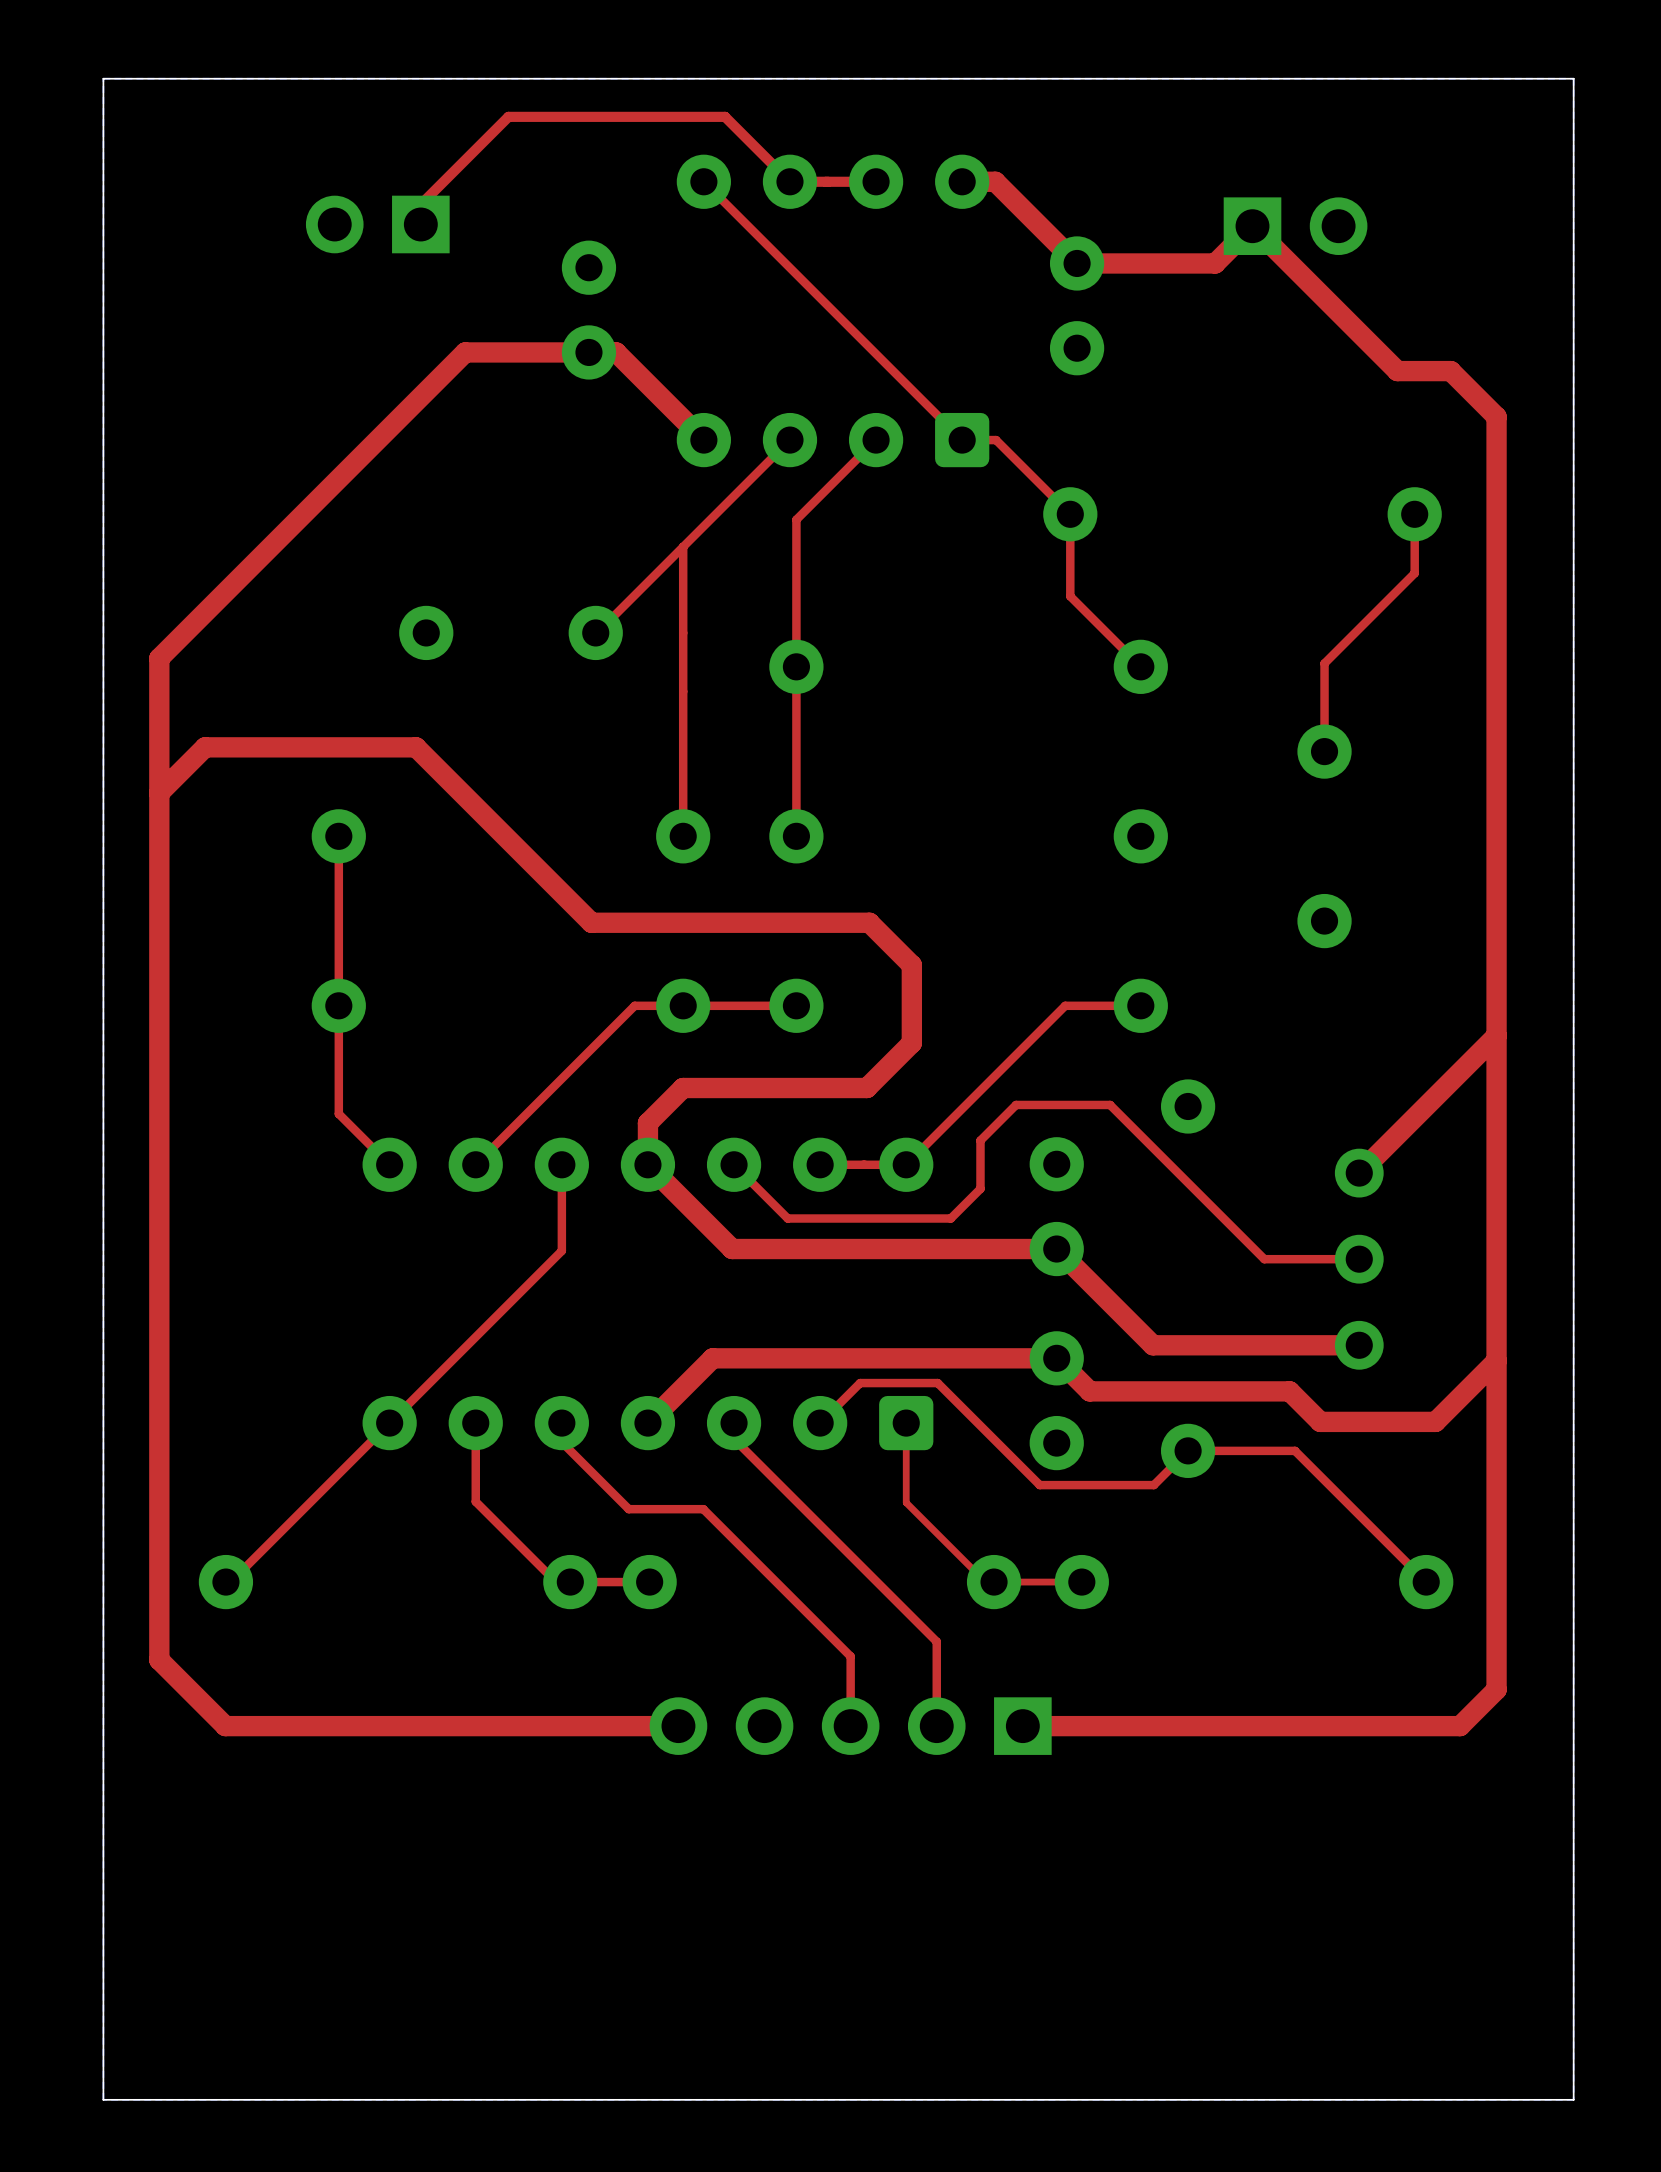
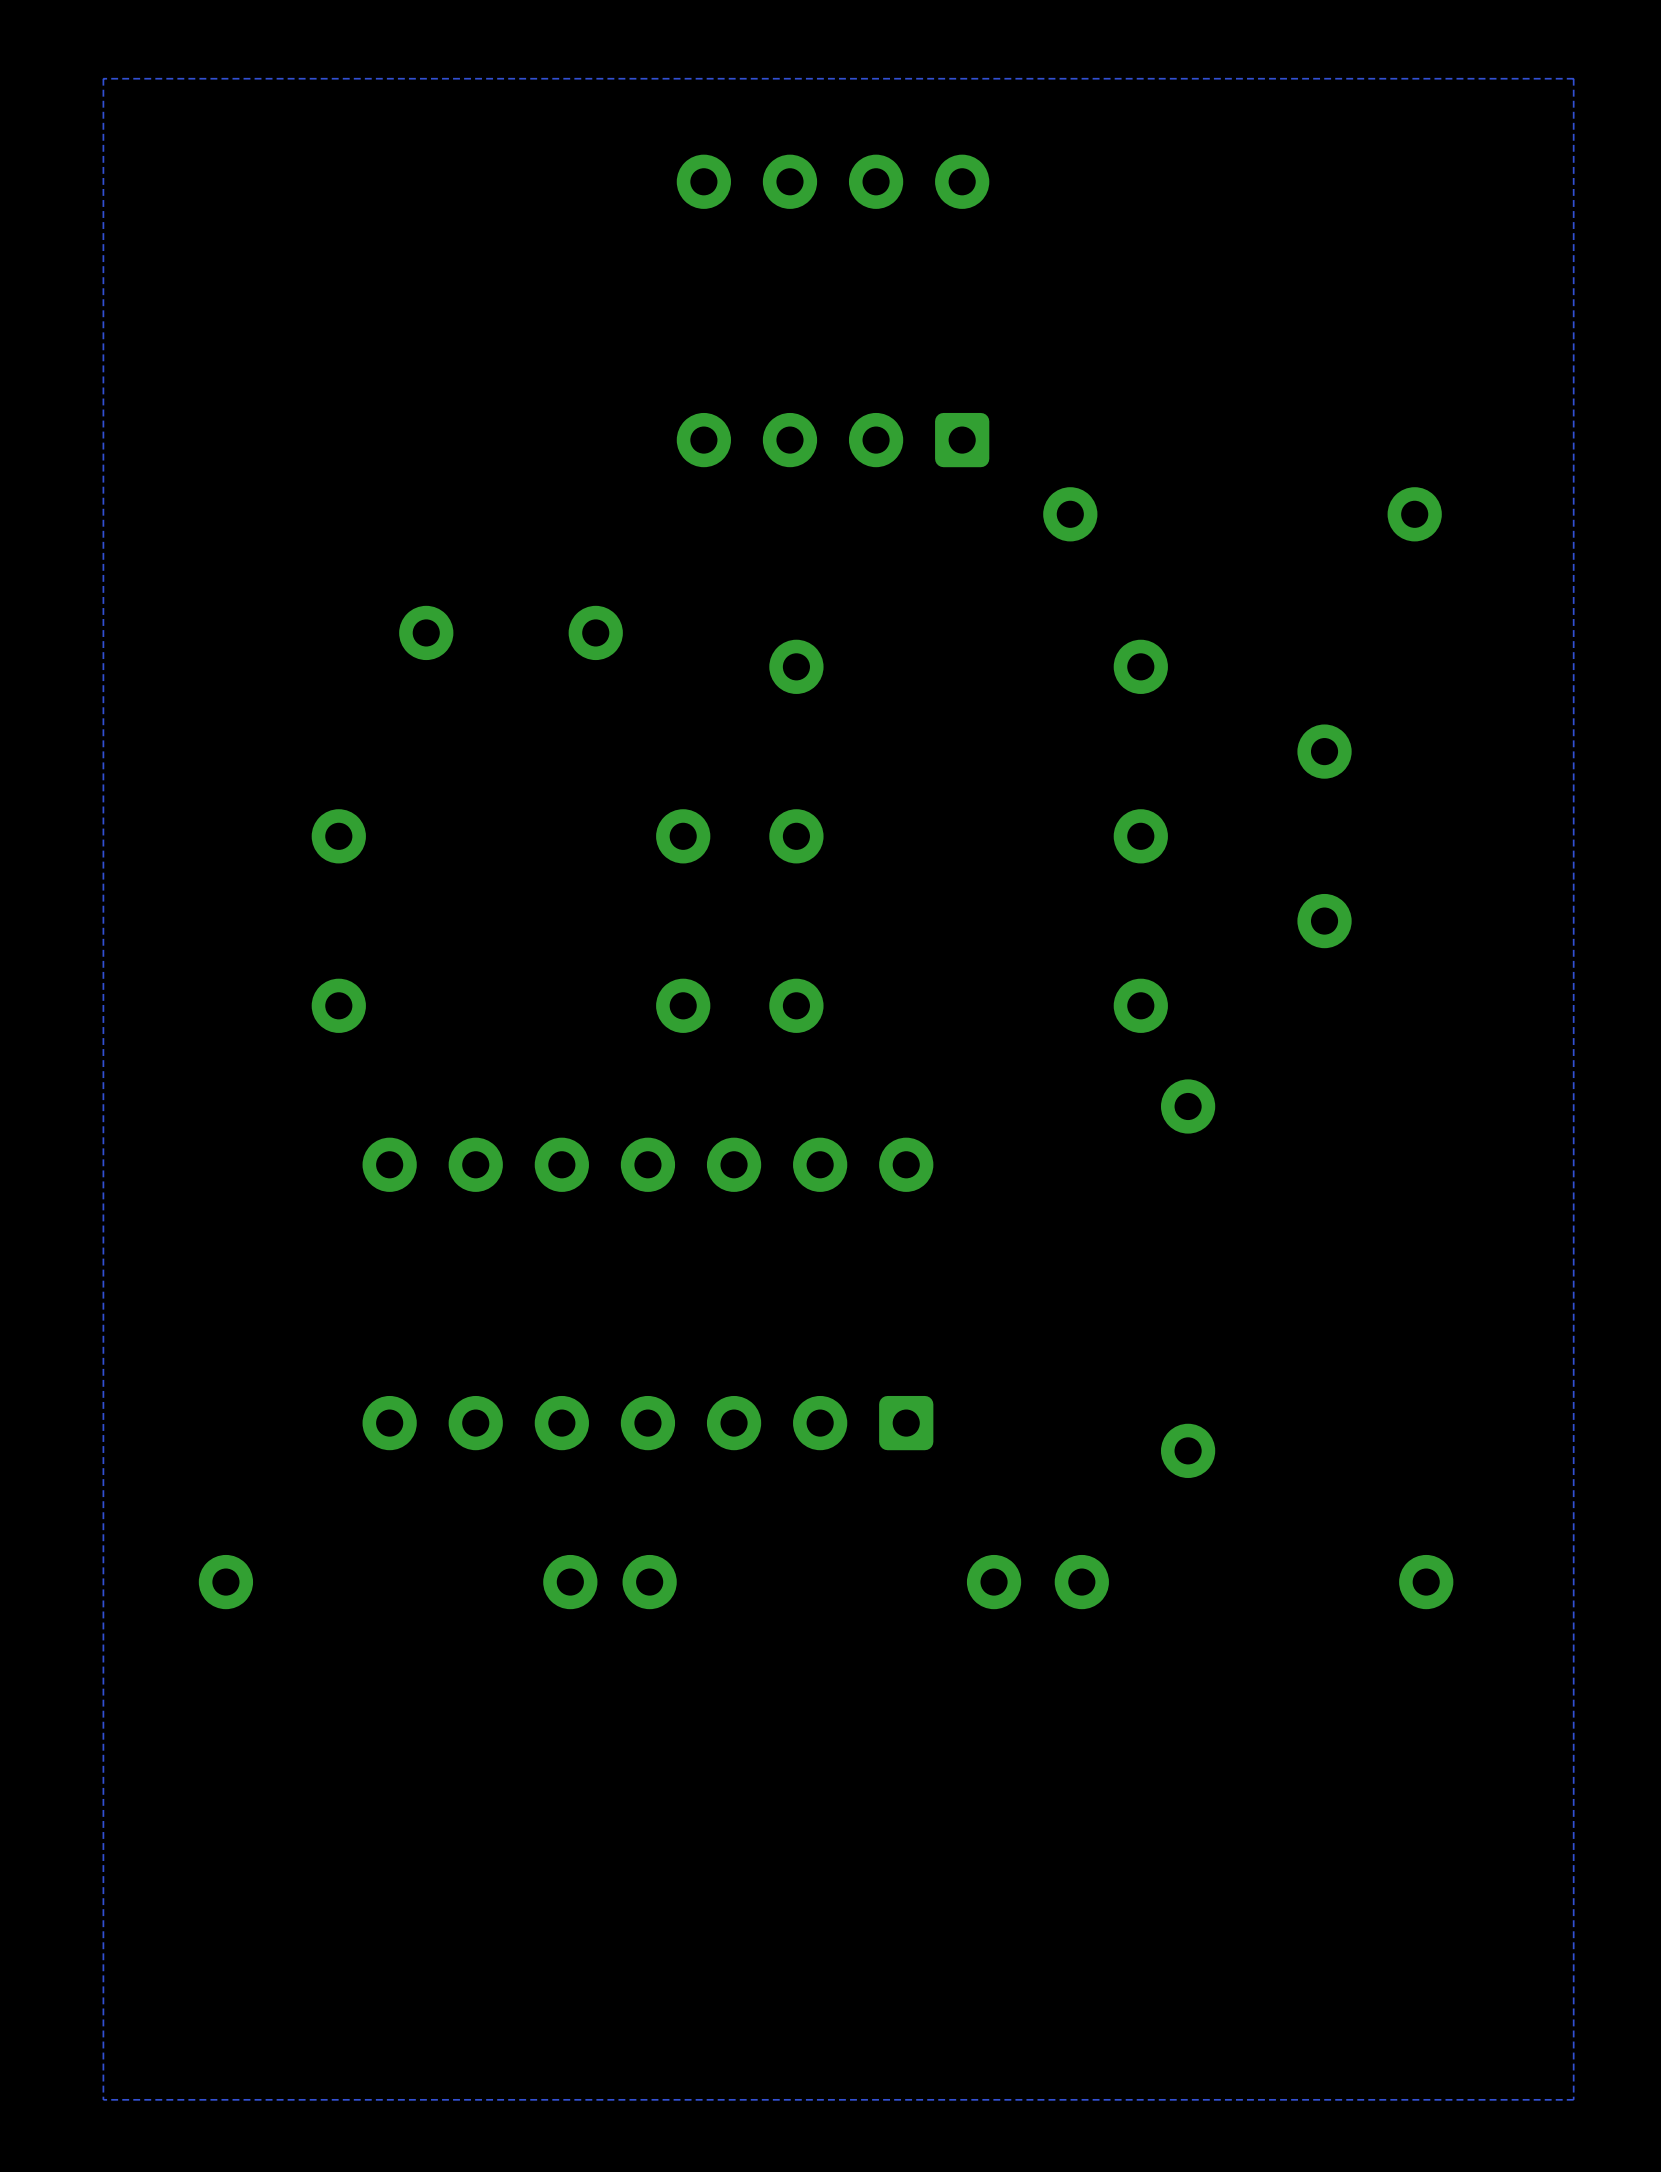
board edge: (1573, 78) (103, 78) (103, 2099) (1573, 2099) (1573, 78) -> none
top track: (703, 181) (962, 440) (996, 440) (1070, 514) (1070, 596) (1140, 666) -> none
top track: (876, 181) (789, 181) (725, 116) (508, 116) (420, 204) (420, 224) -> none
top track: (962, 181) (995, 181) (1077, 263) (1215, 263) (1252, 226) (1397, 371) (1450, 371) (1496, 416) (1496, 1689) (1460, 1726) (1022, 1726) -> none
part: (377, 224) -> none
part: (1295, 226) -> none
part: (1077, 305) -> none
part: (588, 310) -> none
top track: (703, 440) (616, 352) (465, 352) (159, 658) (159, 1660) (225, 1726) (678, 1726) -> none
top track: (789, 440) (595, 632) -> none
top track: (876, 440) (796, 519) (796, 836) -> none
top track: (1414, 514) (1414, 573) (1324, 663) (1324, 751) -> none
top track: (683, 546) (683, 836) -> none
top track: (159, 793) (205, 747) (416, 747) (591, 922) (869, 922) (911, 965) (911, 1043) (866, 1088) (683, 1088) (647, 1123) (647, 1164) (732, 1249) (1056, 1249) (1153, 1345) (1359, 1345) -> none
top track: (338, 836) (338, 1113) (389, 1164) -> none
top track: (796, 1005) (634, 1005) (475, 1164) -> none
top track: (1140, 1005) (1065, 1005) (906, 1164) (820, 1164) -> none
top track: (1496, 1035) (1359, 1173) -> none
top track: (561, 1164) (561, 1250) (234, 1578) (229, 1578) (225, 1582) -> none
top track: (734, 1164) (787, 1218) (950, 1218) (980, 1188) (980, 1140) (1016, 1104) (1110, 1104) (1264, 1259) (1359, 1259) -> none
part: (1056, 1206) -> none
part: (1359, 1259) -> none
top track: (1496, 1360) (1435, 1421) (1320, 1421) (1289, 1391) (1089, 1391) (1056, 1358) (712, 1358) (647, 1423) -> none
part: (1056, 1400) -> none
top track: (475, 1423) (475, 1501) (556, 1582) (649, 1582) -> none
top track: (561, 1423) (561, 1442) (628, 1509) (703, 1509) (850, 1656) (850, 1726) -> none
top track: (734, 1423) (734, 1439) (936, 1641) (936, 1726) -> none
top track: (820, 1423) (860, 1383) (937, 1383) (1039, 1485) (1153, 1485) (1188, 1450) (1295, 1450) (1426, 1582) -> none
top track: (906, 1423) (906, 1502) (985, 1582) (1081, 1582) -> none
part: (850, 1726) -> none

